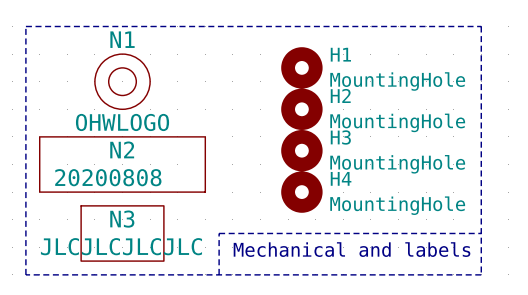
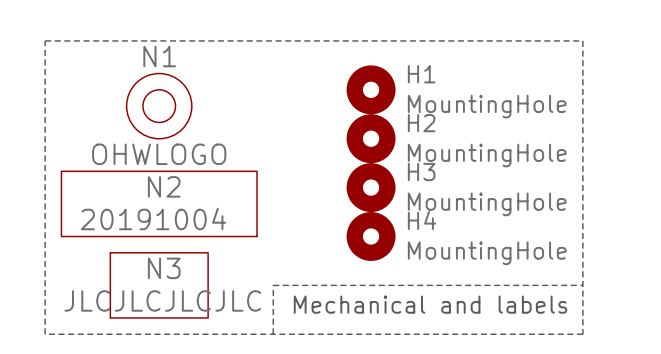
N2 value: 20200808 (108, 177) -> 20191004 (153, 219)

